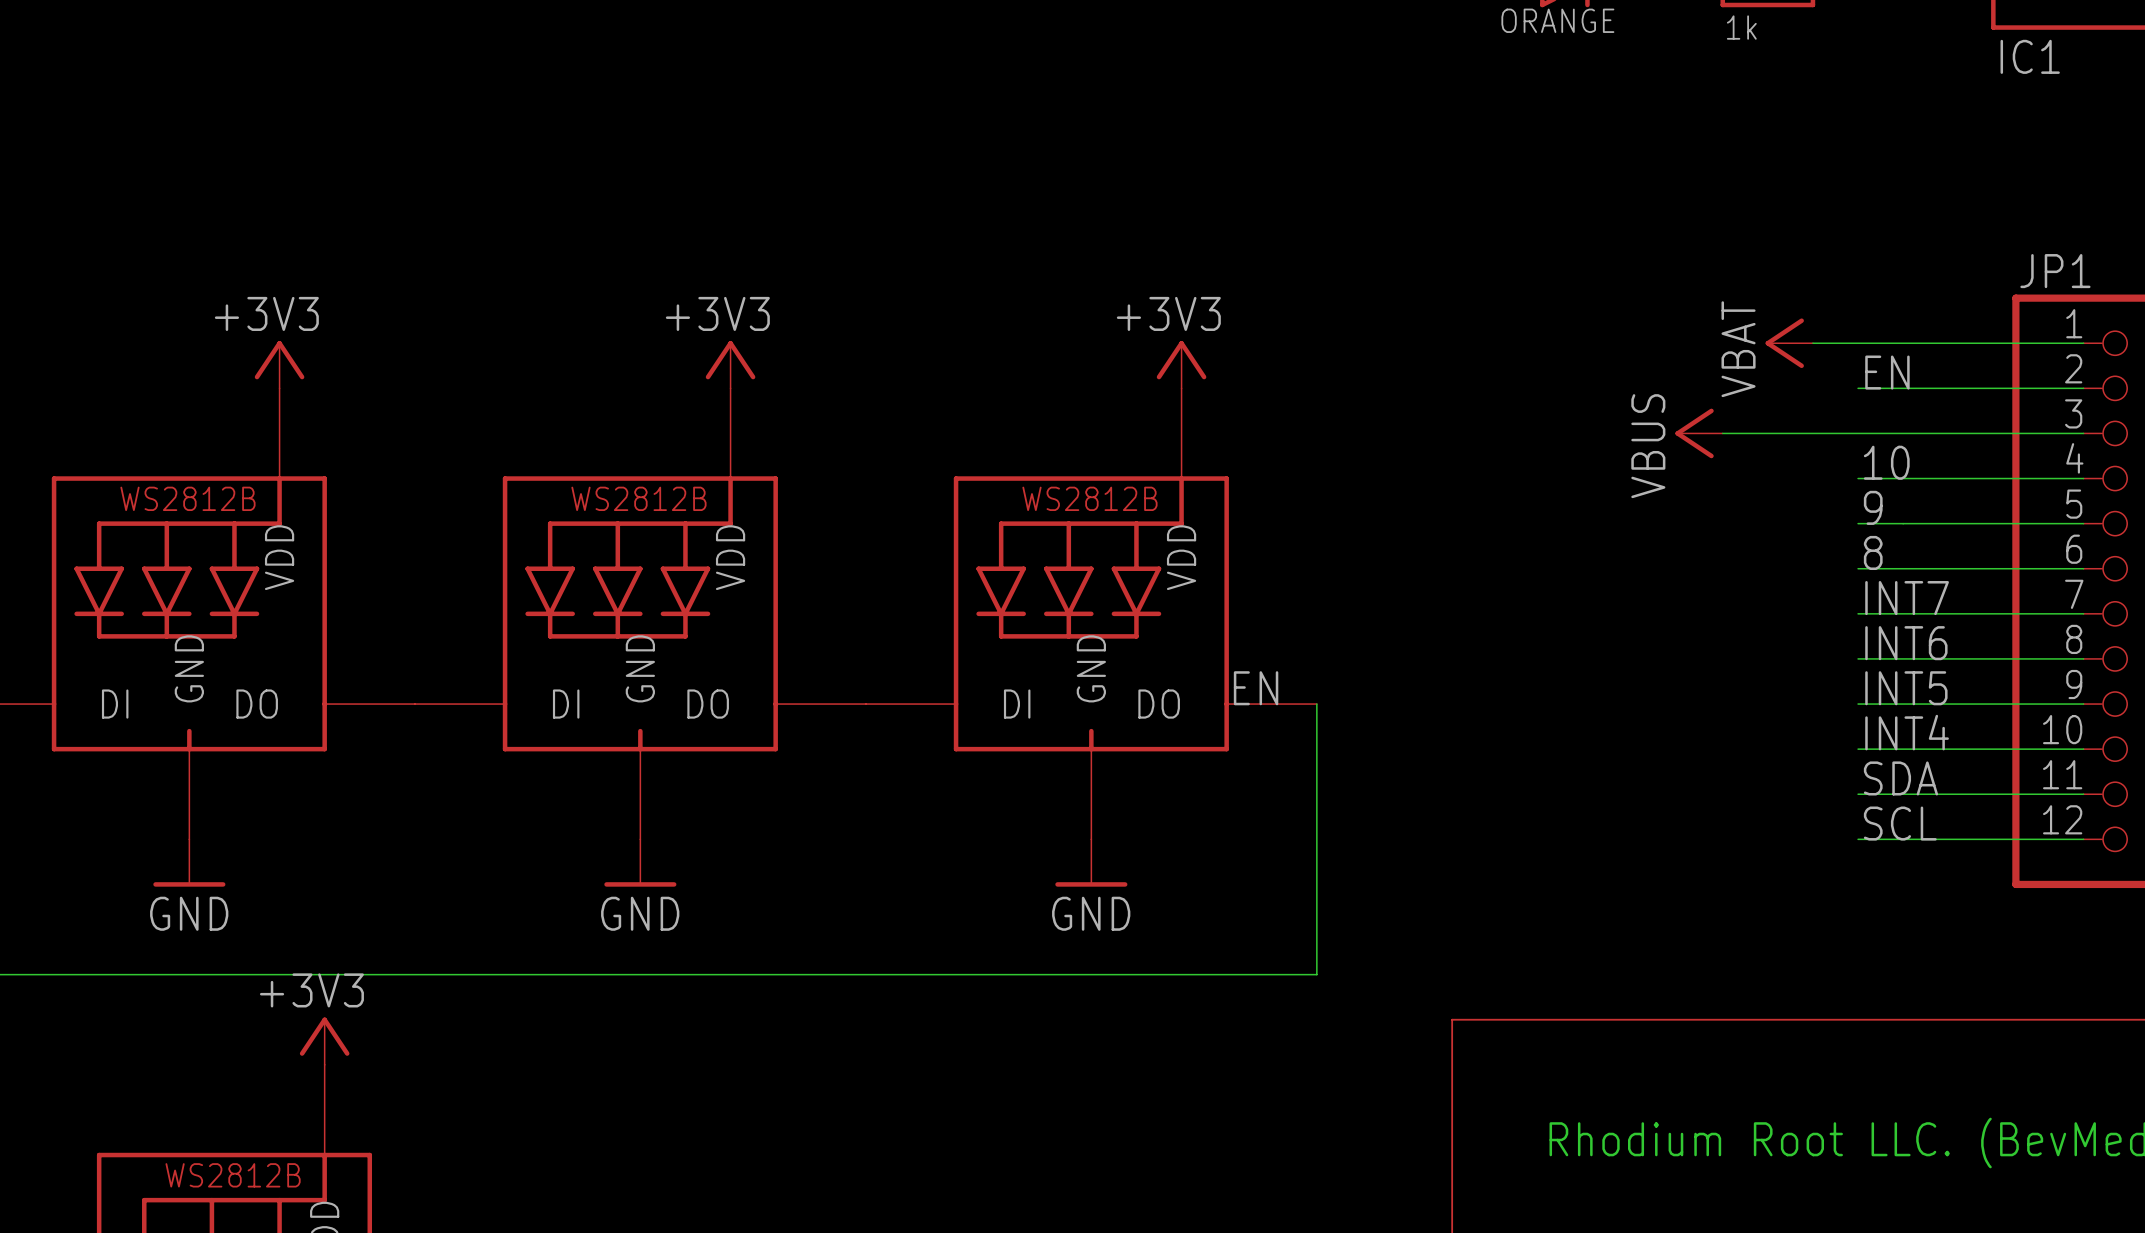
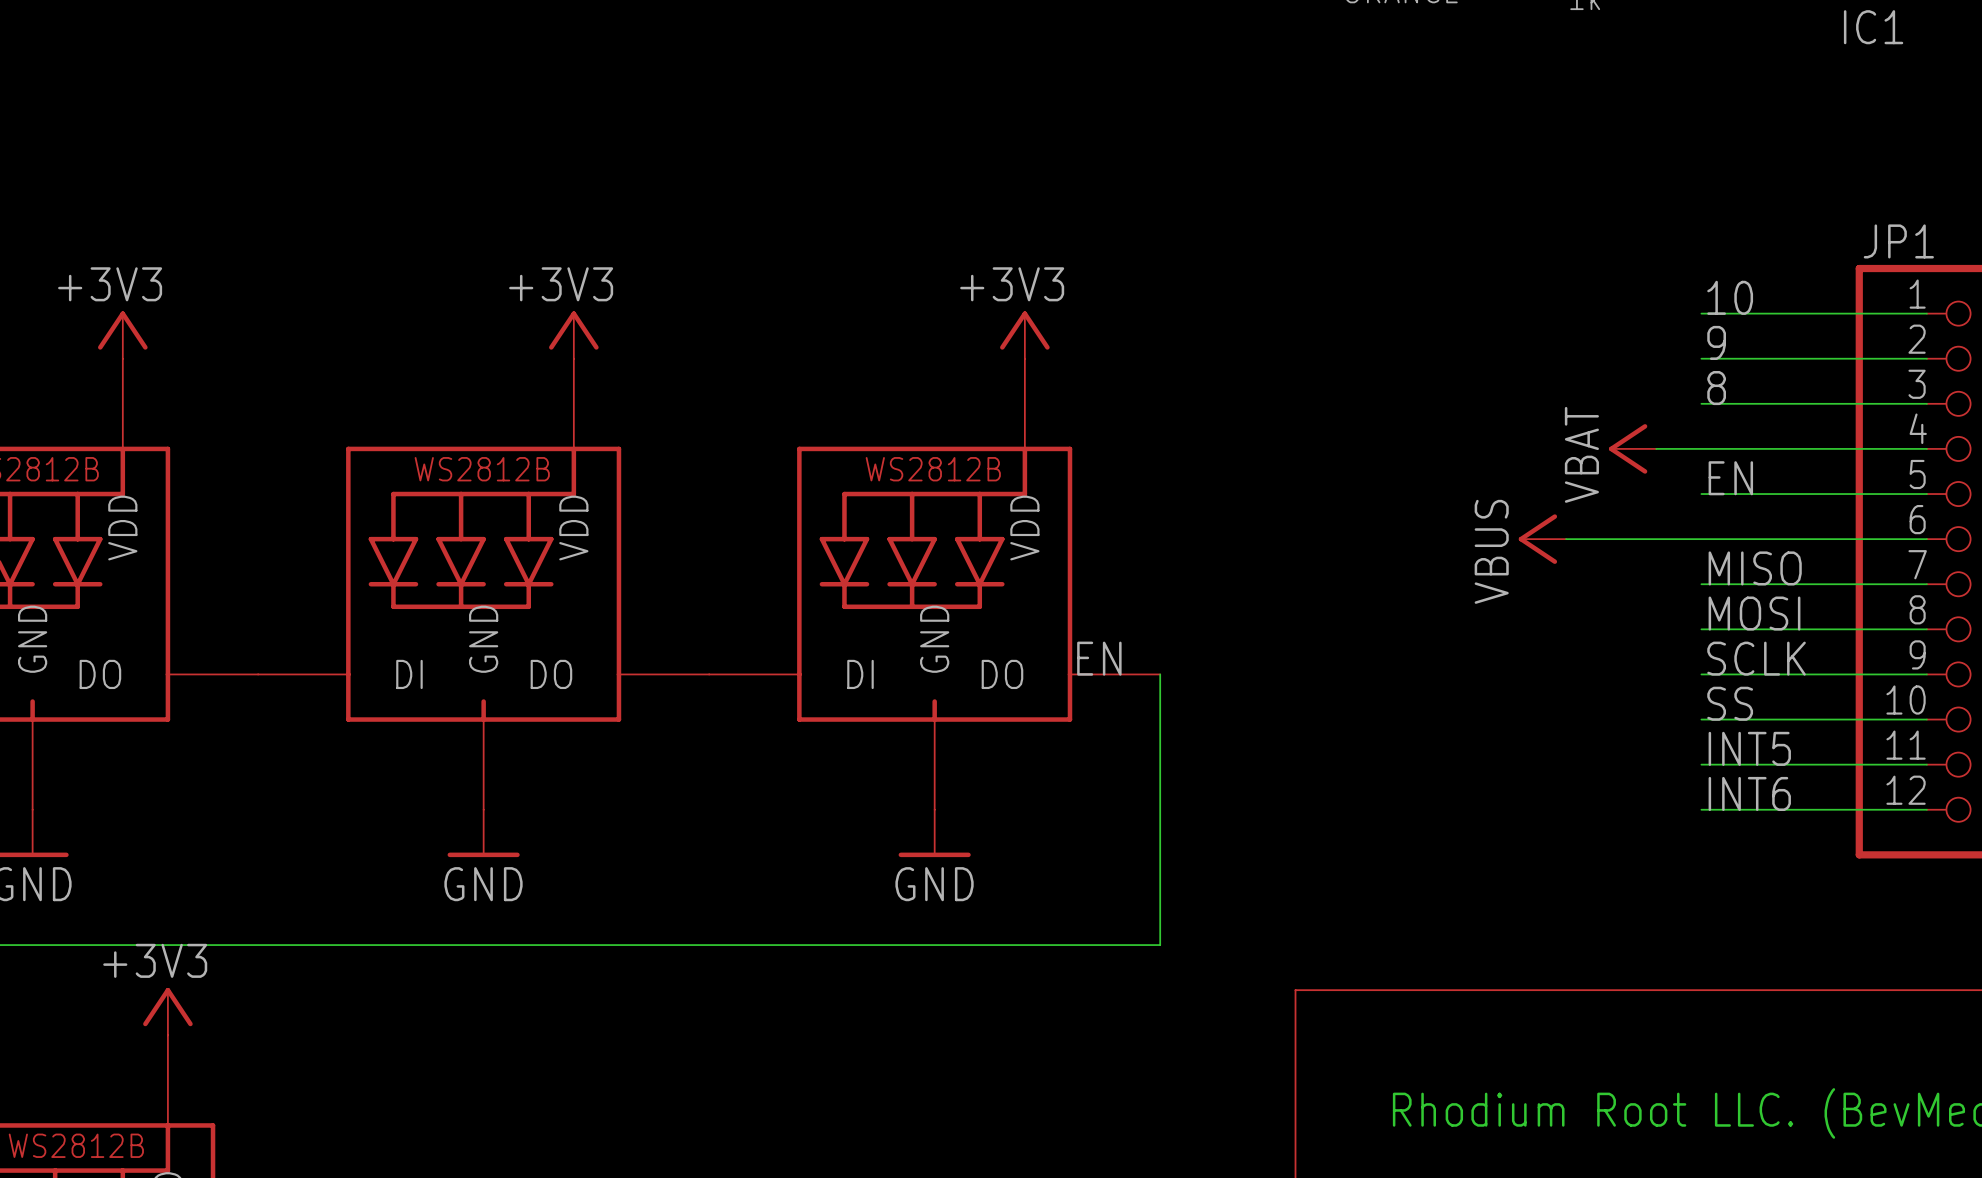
power symbol position: VBAT (1789, 343) -> VBAT (1632, 448)
wire: (1812, 343) (1858, 343) -> (1656, 448) (1701, 448)
label: EN (1887, 372) -> 9 (1716, 342)
power symbol position: VBUS (1699, 433) -> VBUS (1542, 539)
wire: (1722, 433) (1858, 433) -> (1566, 539) (1701, 539)
label position: 10 (1886, 462) -> 10 (1730, 297)
label: 9 (1873, 507) -> EN (1730, 478)
label position: 8 (1873, 552) -> 8 (1716, 388)
label: INT7 (1907, 598) -> MISO (1755, 568)
label: INT6 (1906, 643) -> MOSI (1754, 613)
label: INT5 (1906, 688) -> SCLK (1756, 658)
label: INT4 (1907, 732) -> SS (1730, 703)
label: SDA (1900, 778) -> INT5 (1749, 748)
label: SCL (1900, 823) -> INT6 (1749, 793)

